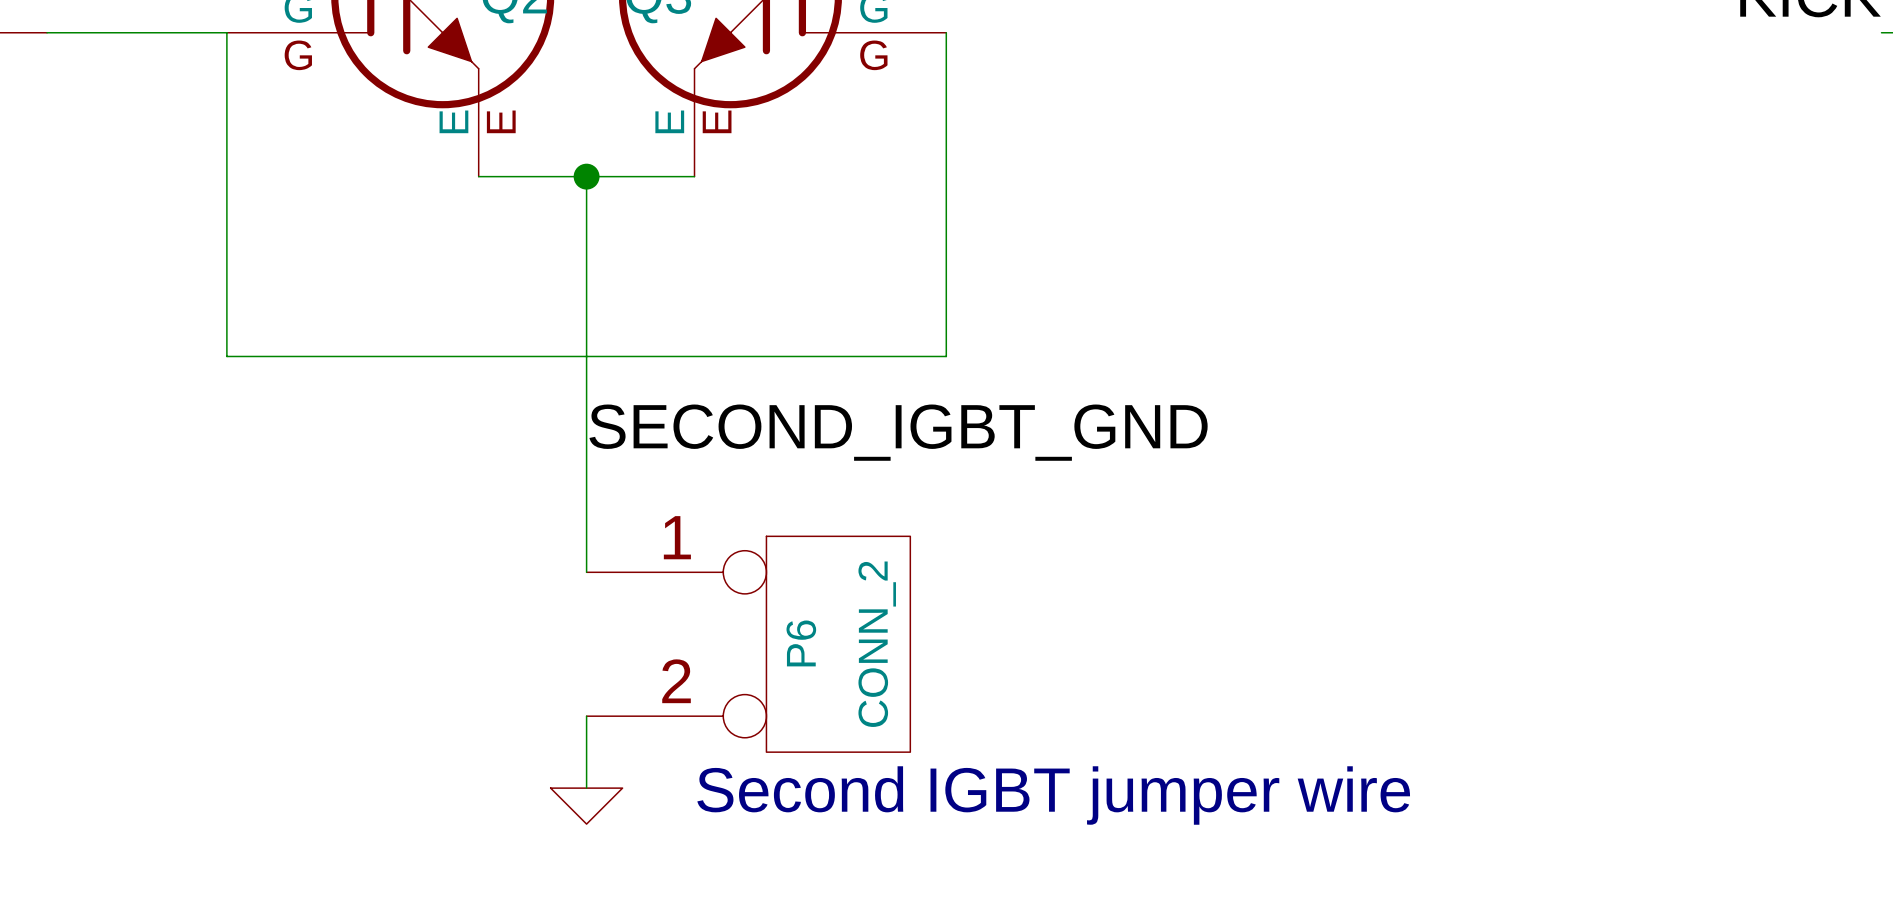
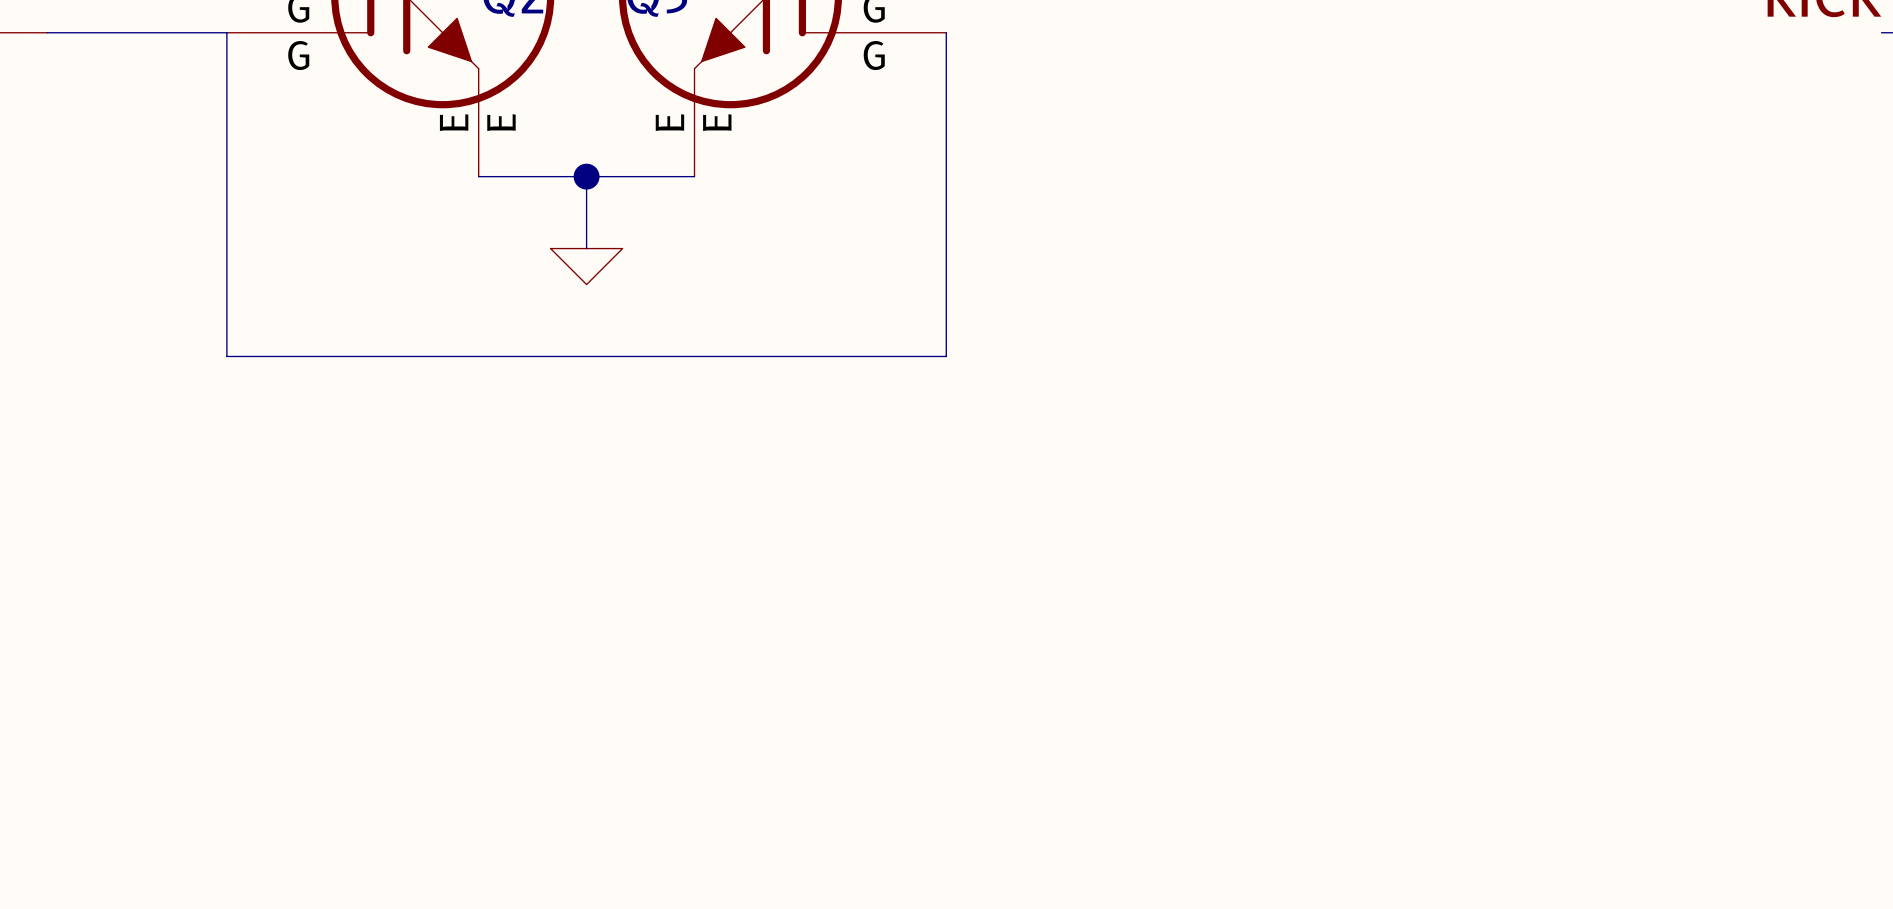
wire: (586, 248) (586, 572) -> none
label: SECOND_IGBT_GND (898, 432) -> none
P6: CONN_2 (748, 644) -> none
wire: (586, 716) (586, 788) -> none
text: Second IGBT jumper wire (1053, 795) -> none
power symbol position: (586, 806) -> (586, 266)

